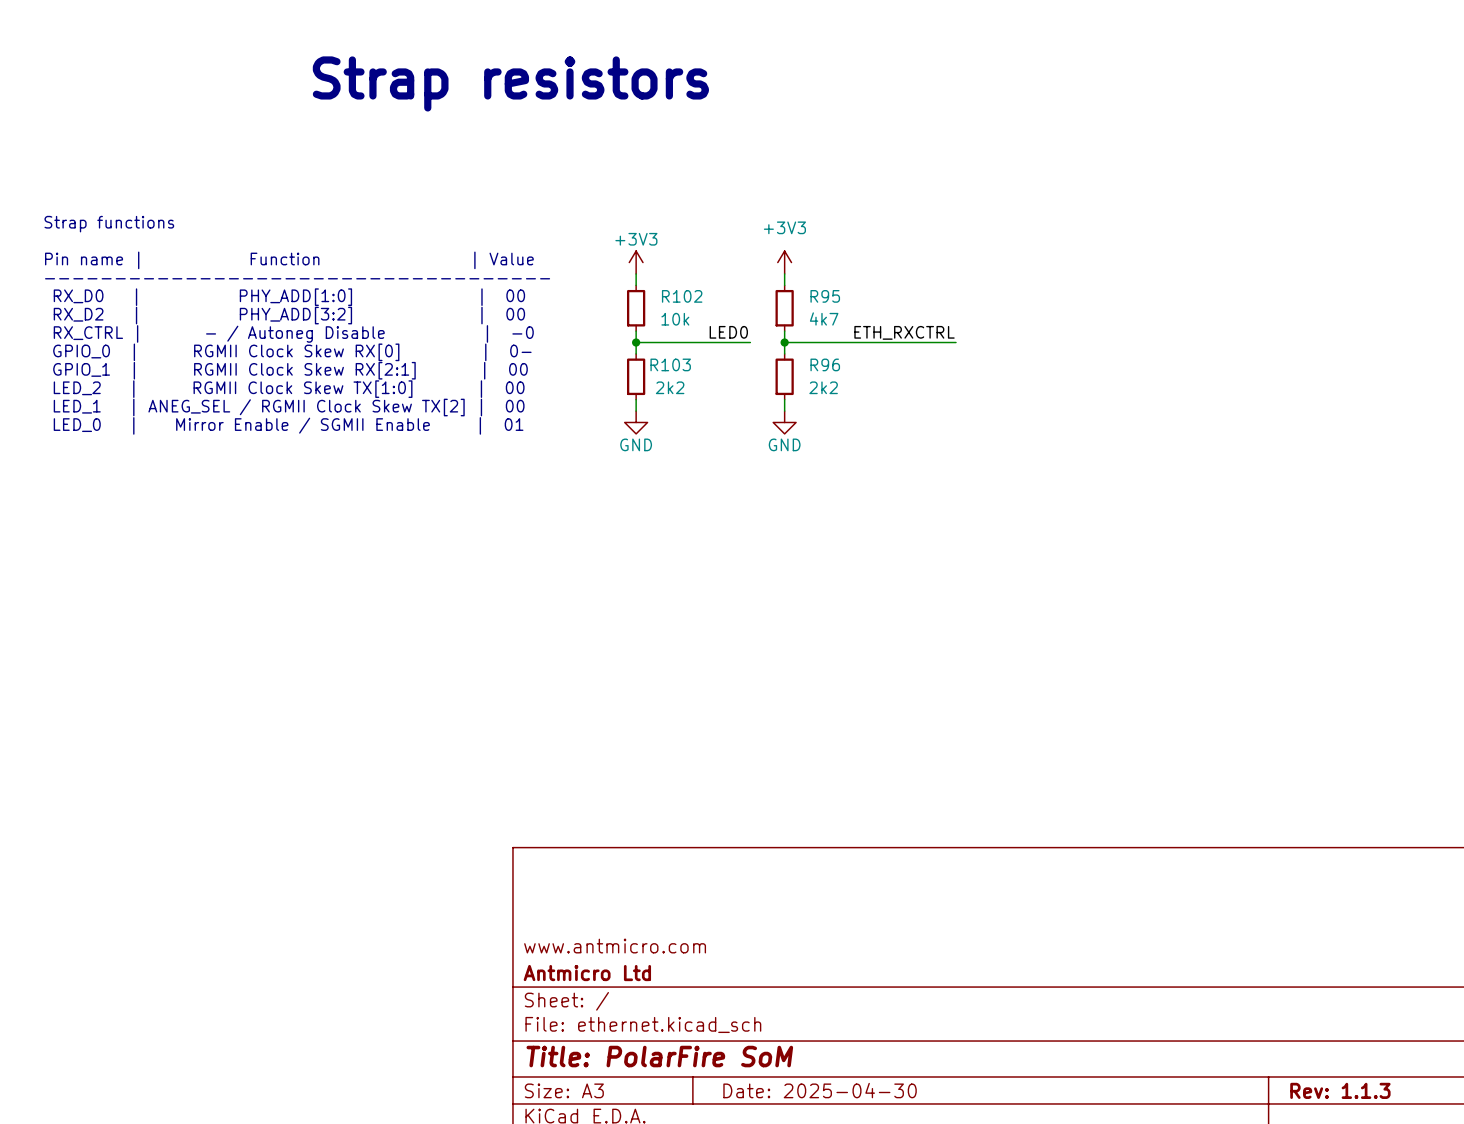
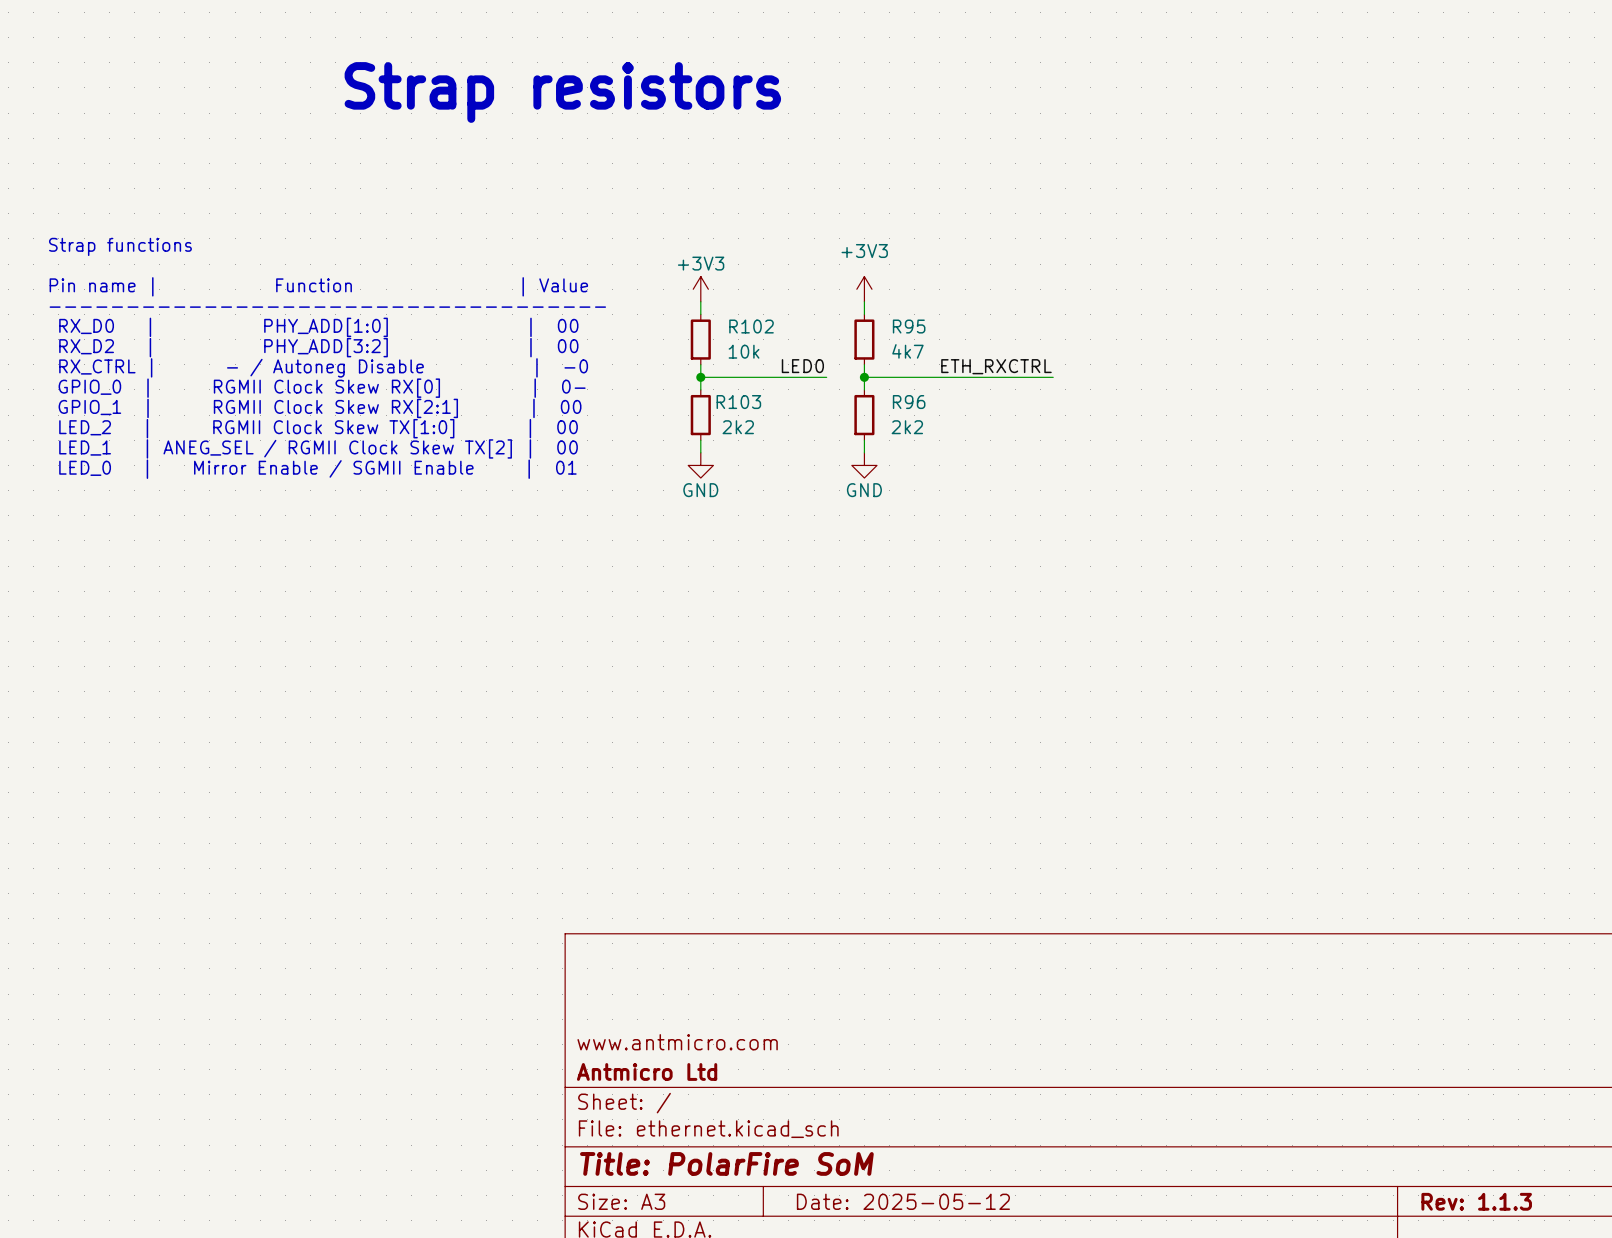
title block: Date: 2025-04-30 (820, 1090) -> Date: 2025-05-12 (903, 1201)

